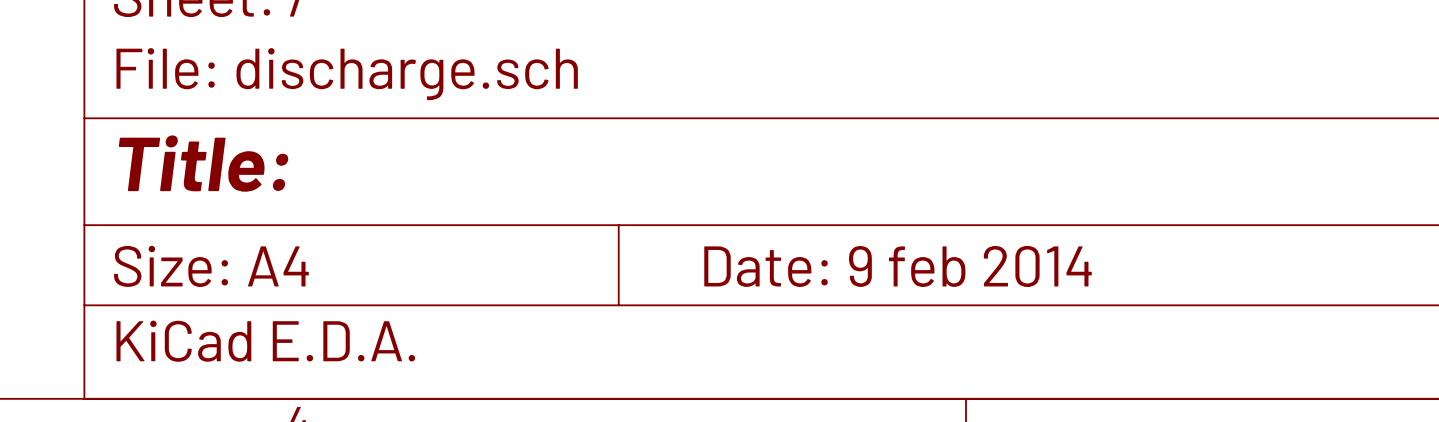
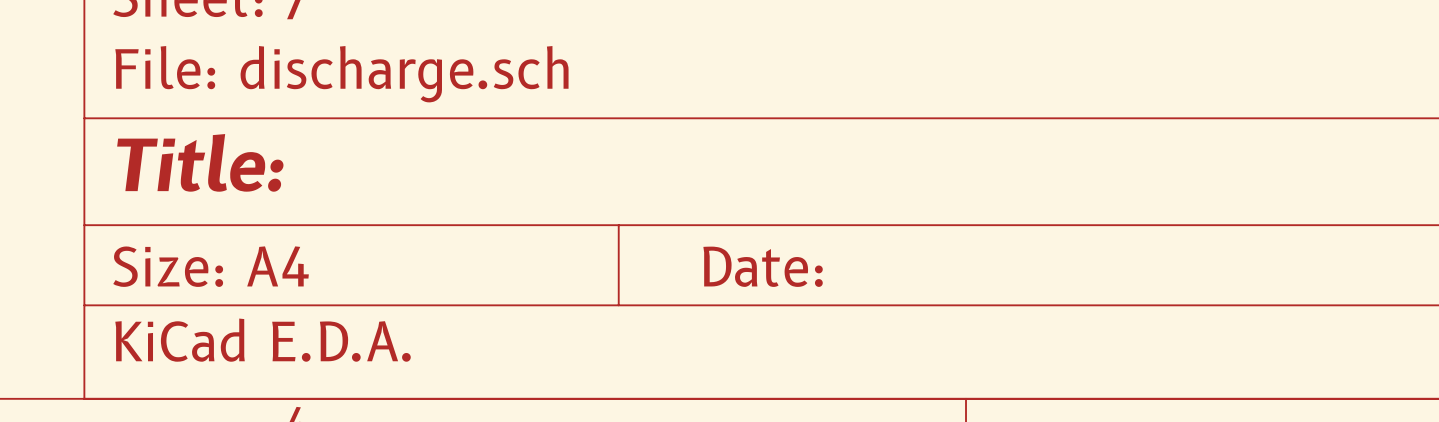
title block: Date: 9 feb 2014 (898, 266) -> Date: (763, 266)

